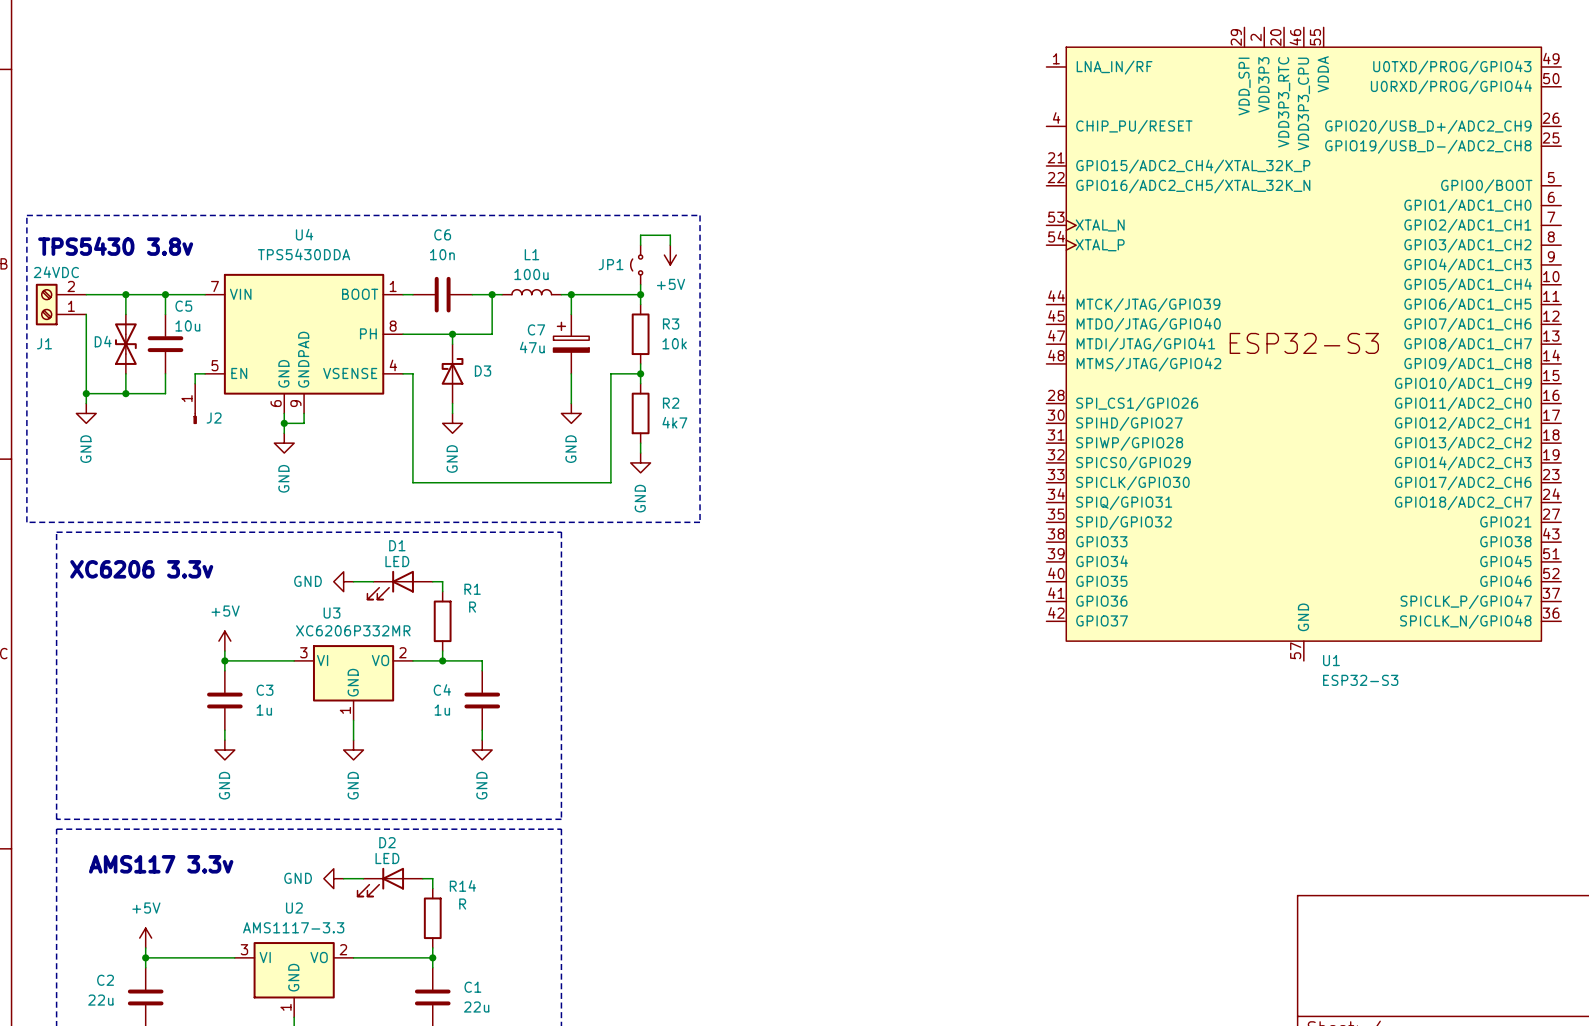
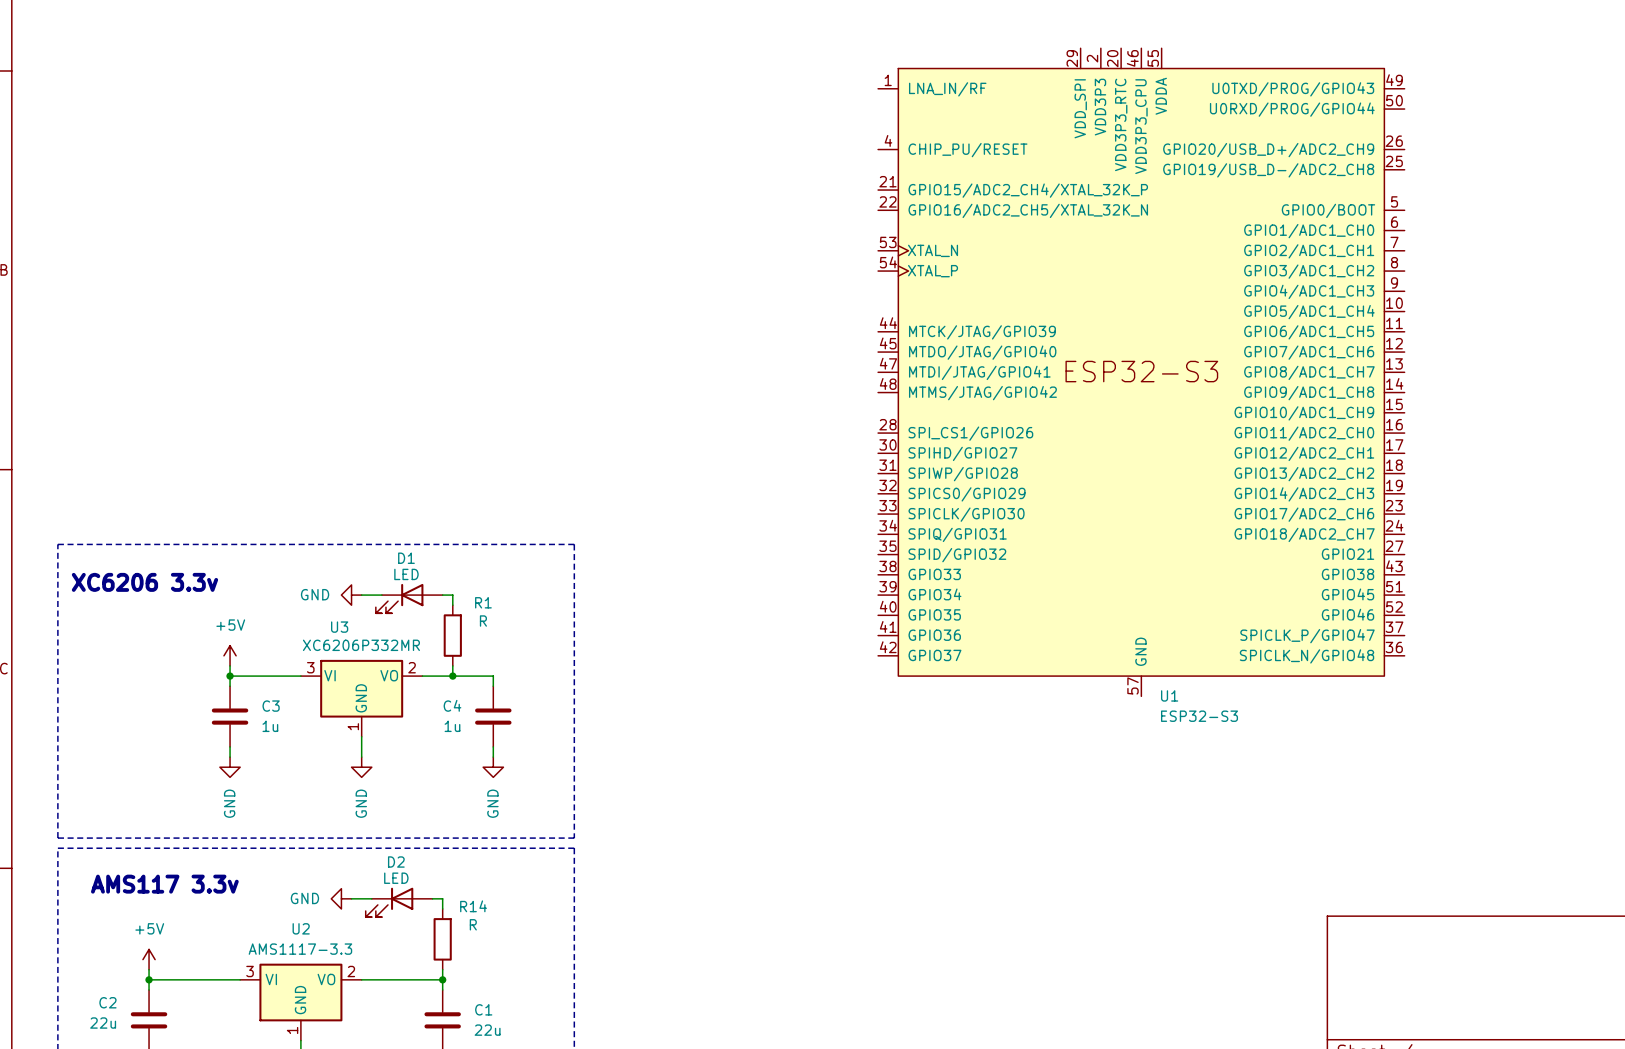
line: (26, 215) (700, 215) (700, 522) (26, 522) (26, 215) -> none
wire: (640, 245) (640, 235) (670, 235) (670, 245) -> none
text: TPS5430 3.8v (115, 246) -> none
power symbol: +5V (670, 255) -> none
JP1: (636, 264) -> none
wire: (640, 284) (640, 304) -> none
L1: 100u (531, 292) -> none
wire: (86, 294) (205, 294) -> none
wire: (125, 294) (125, 314) -> none
junction: (125, 294) -> none
wire: (165, 294) (165, 314) -> none
junction: (165, 294) -> none
wire: (403, 294) (412, 294) -> none
C6: 10n (442, 294) -> none
wire: (472, 294) (502, 294) -> none
wire: (492, 294) (492, 334) (403, 334) -> none
junction: (492, 294) -> none
wire: (561, 294) (640, 294) -> none
wire: (571, 294) (571, 314) -> none
junction: (571, 294) -> none
junction: (640, 294) -> none
J1: 24VDC (61, 304) -> none
wire: (86, 314) (86, 403) -> none
wire: (452, 334) (452, 344) -> none
junction: (452, 334) -> none
R3: 10k (640, 334) -> none
U4: TPS5430DDA (304, 343) -> none
D4: (125, 344) -> none
C5: 10u (165, 344) -> none
C7: 47u (571, 344) -> none
U1 position: (1303, 344) -> (1141, 372)
wire: (640, 363) (640, 383) -> none
wire: (125, 373) (125, 393) -> none
wire: (165, 373) (165, 393) (86, 393) -> none
wire: (205, 373) (195, 373) (195, 383) -> none
wire: (403, 373) (412, 373) (412, 482) (610, 482) (610, 373) (640, 373) -> none
D3: (452, 373) -> none
wire: (571, 373) (571, 403) -> none
junction: (640, 373) -> none
junction: (86, 393) -> none
junction: (125, 393) -> none
J2: (195, 403) -> none
wire: (452, 403) (452, 413) -> none
power symbol: GND (86, 413) -> none
wire: (284, 413) (284, 433) -> none
wire: (304, 413) (304, 423) (284, 423) -> none
power symbol: GND (571, 413) -> none
R2: 4k7 (640, 413) -> none
junction: (284, 423) -> none
power symbol: GND (452, 423) -> none
power symbol: GND (284, 443) -> none
wire: (640, 443) (640, 453) -> none
power symbol: GND (640, 462) -> none

